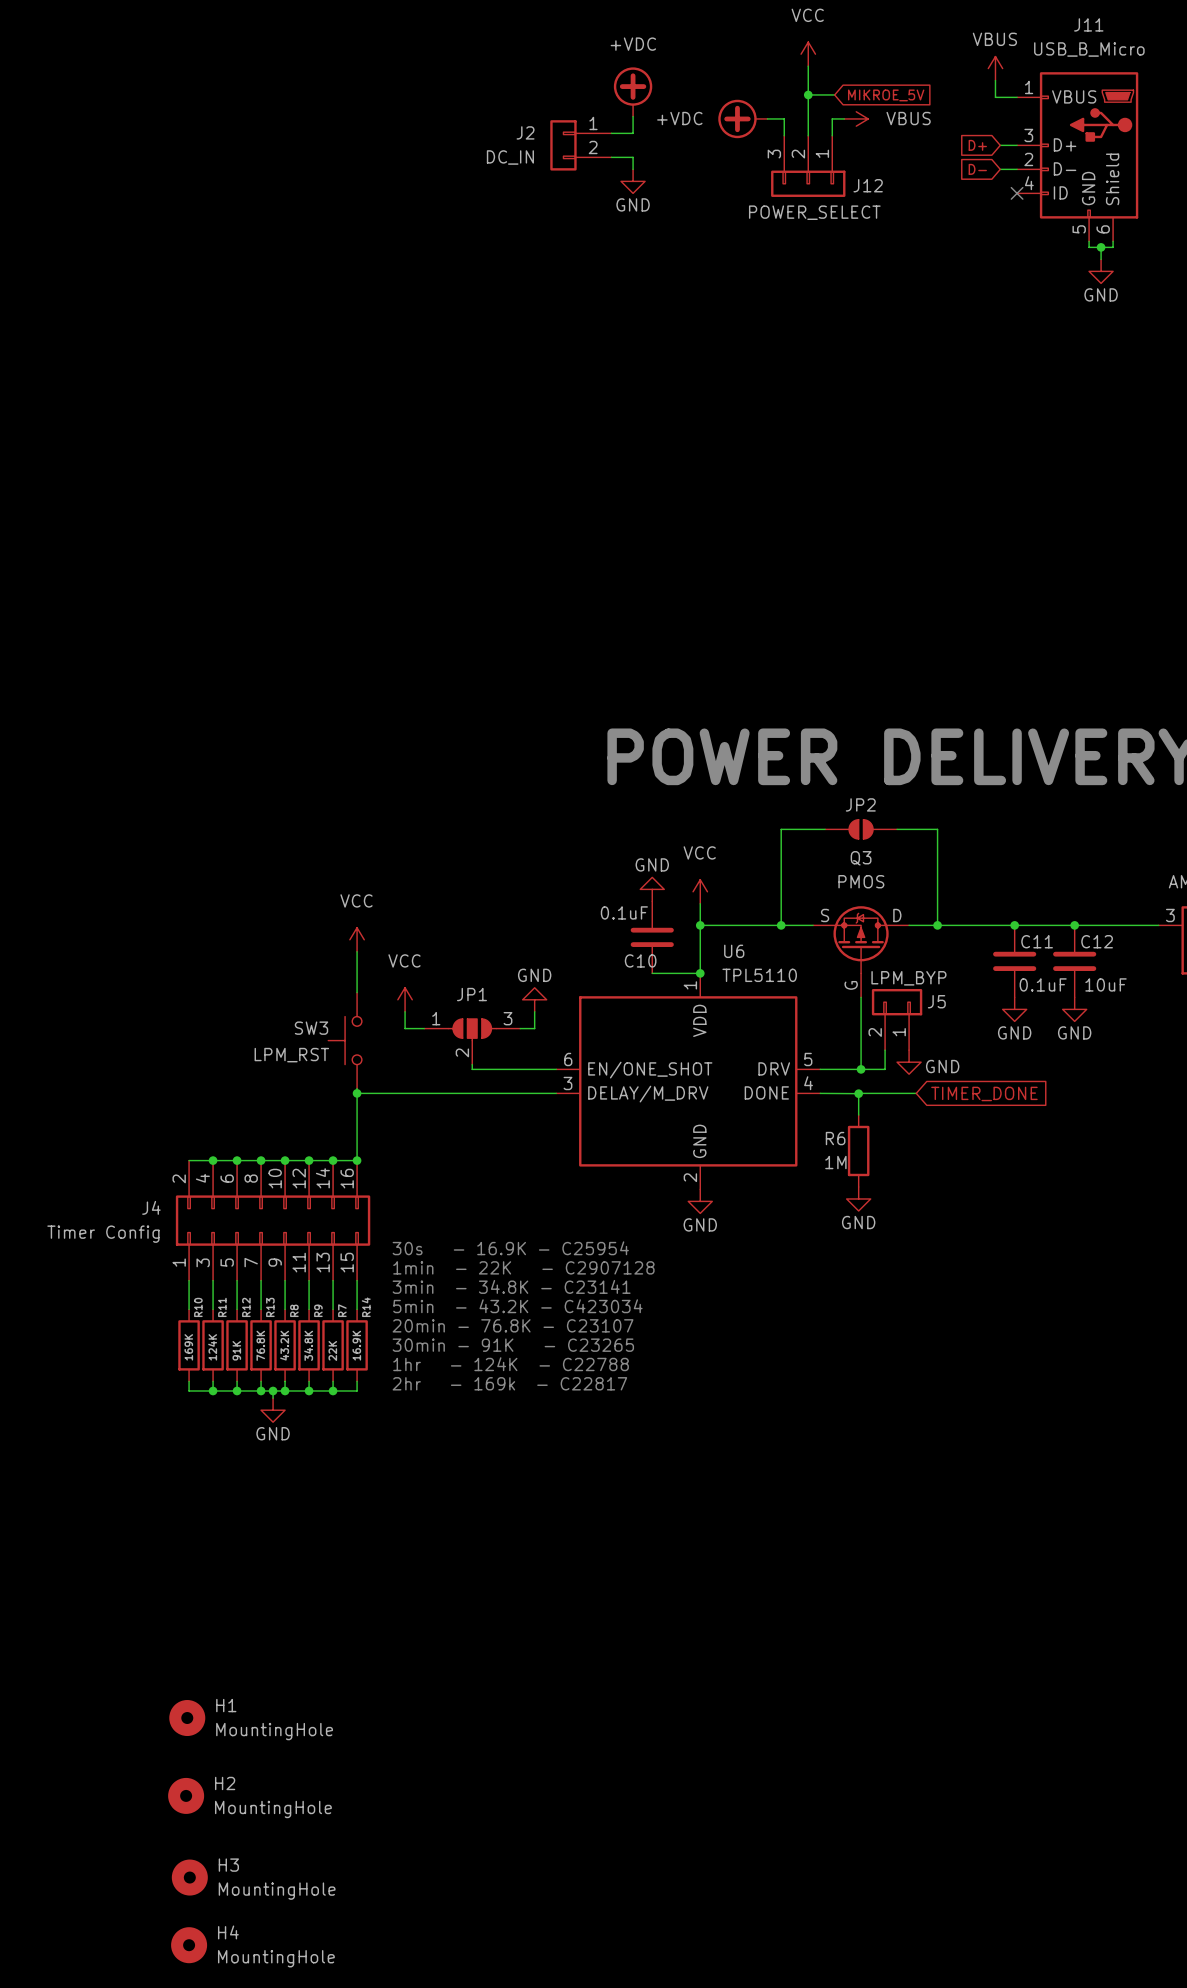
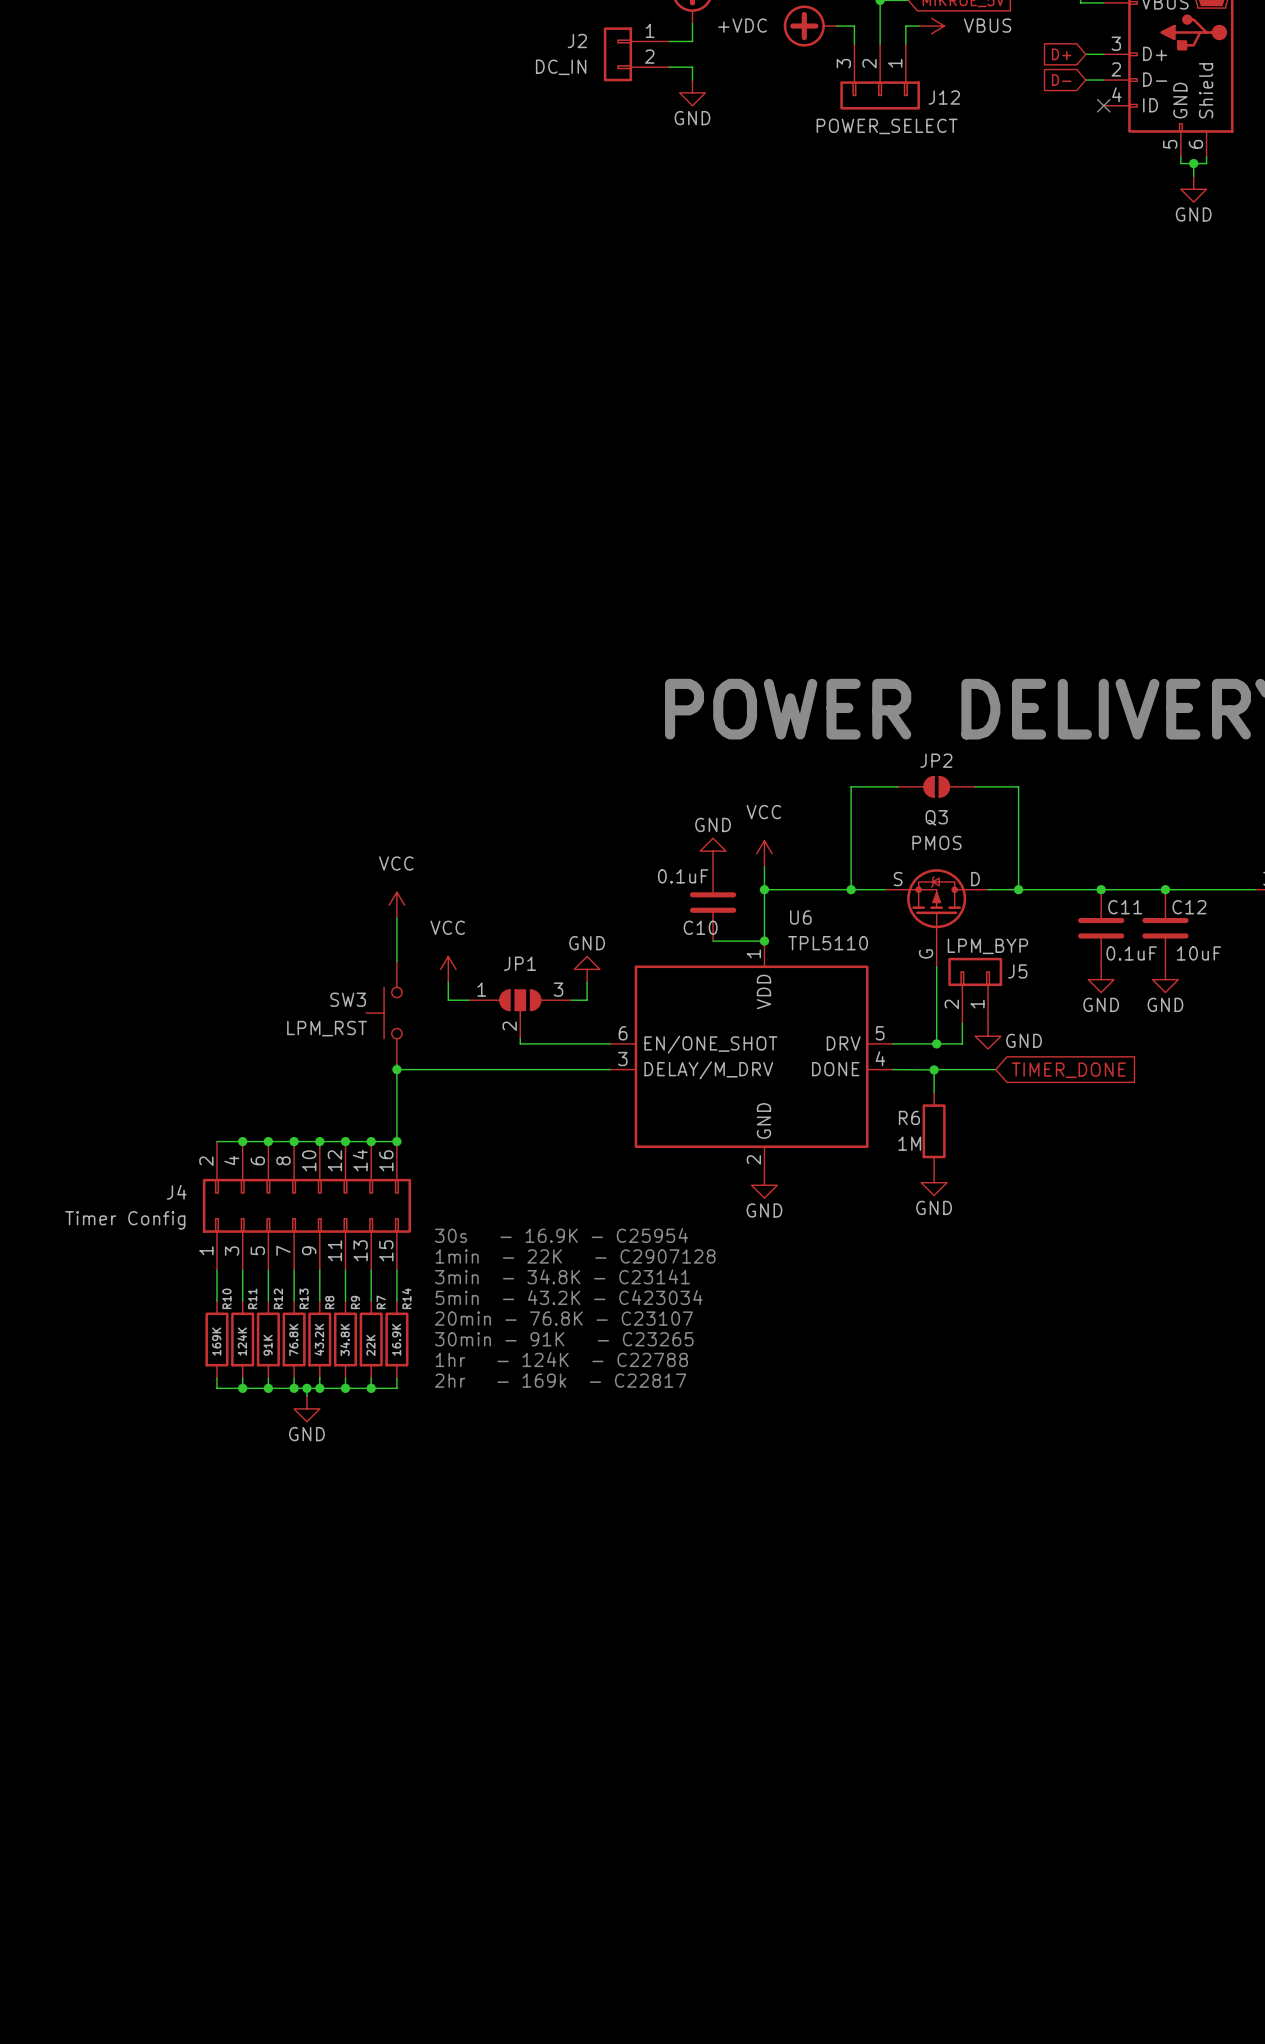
H1: MountingHole (187, 1718) -> none
H2: MountingHole (186, 1795) -> none
H3: MountingHole (189, 1877) -> none
H4: MountingHole (189, 1945) -> none

